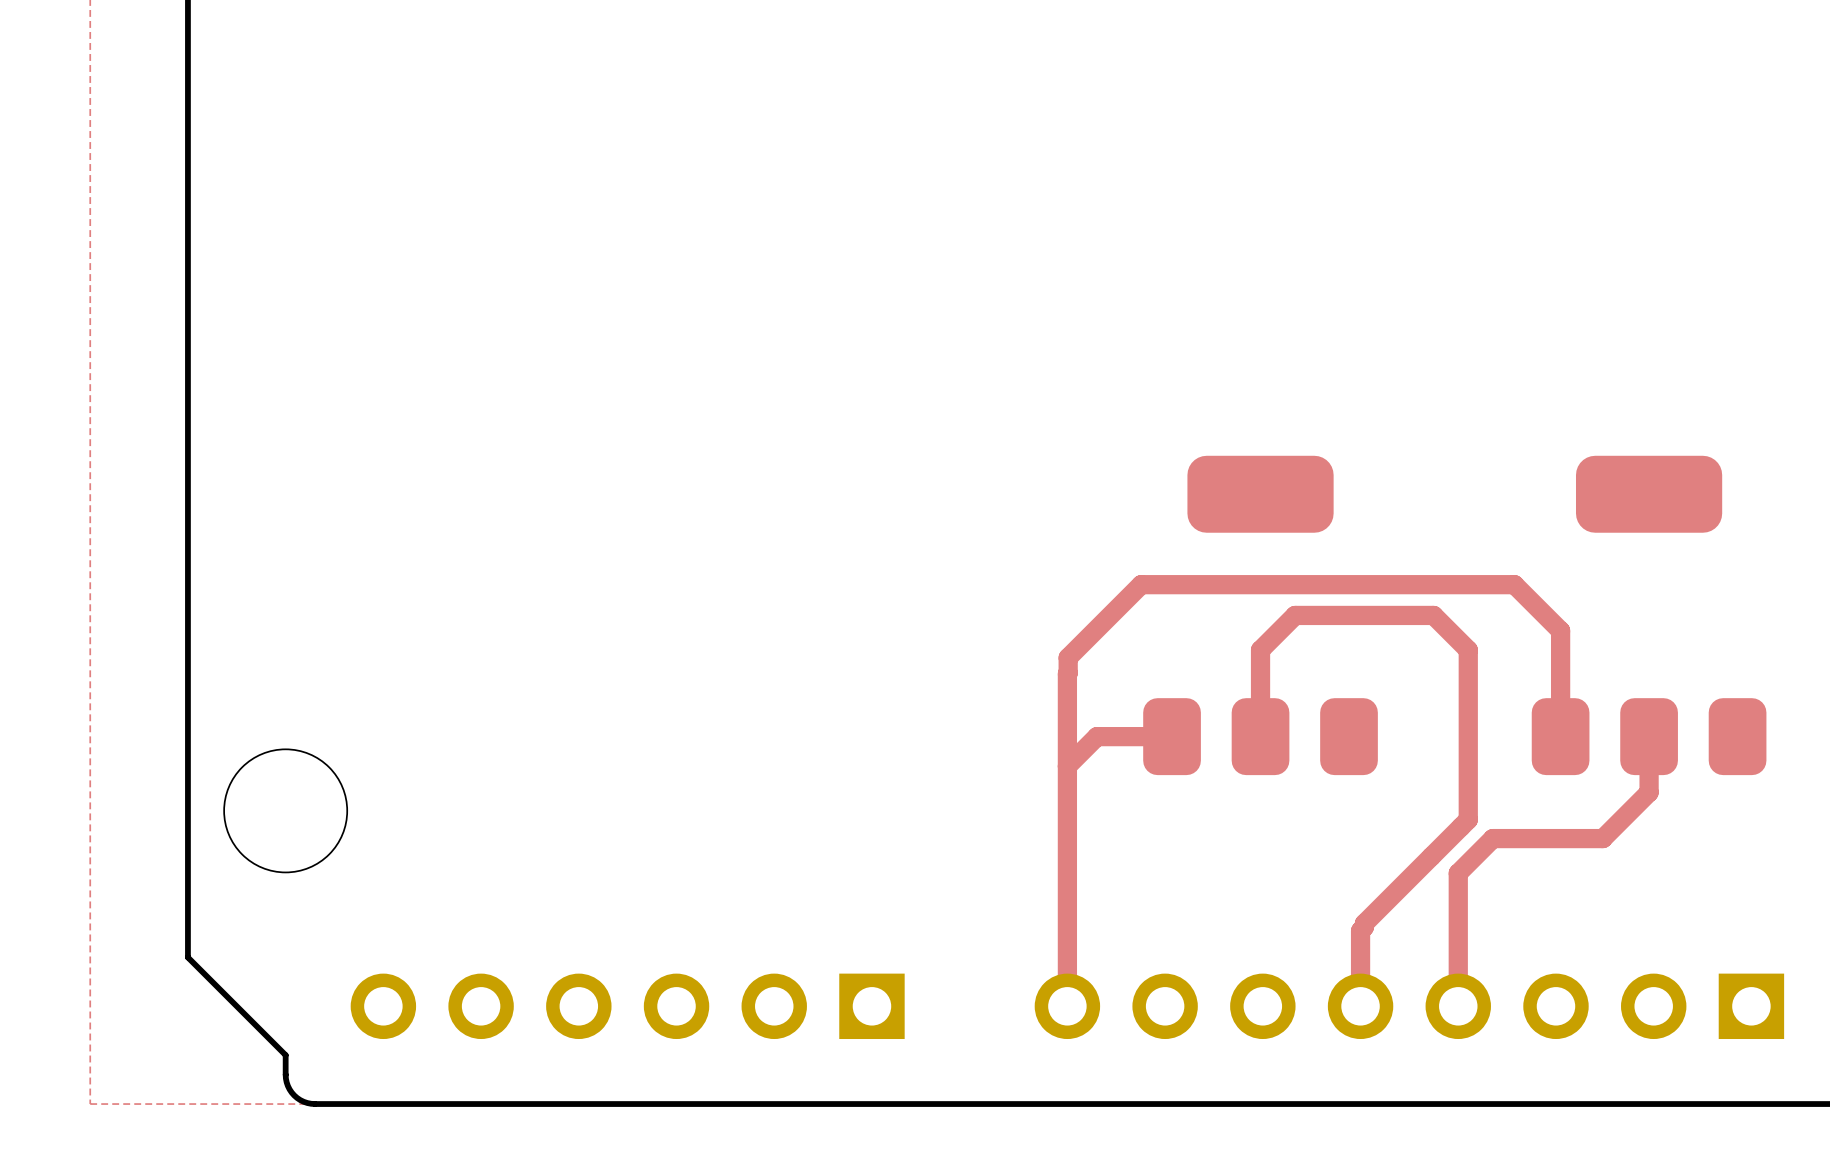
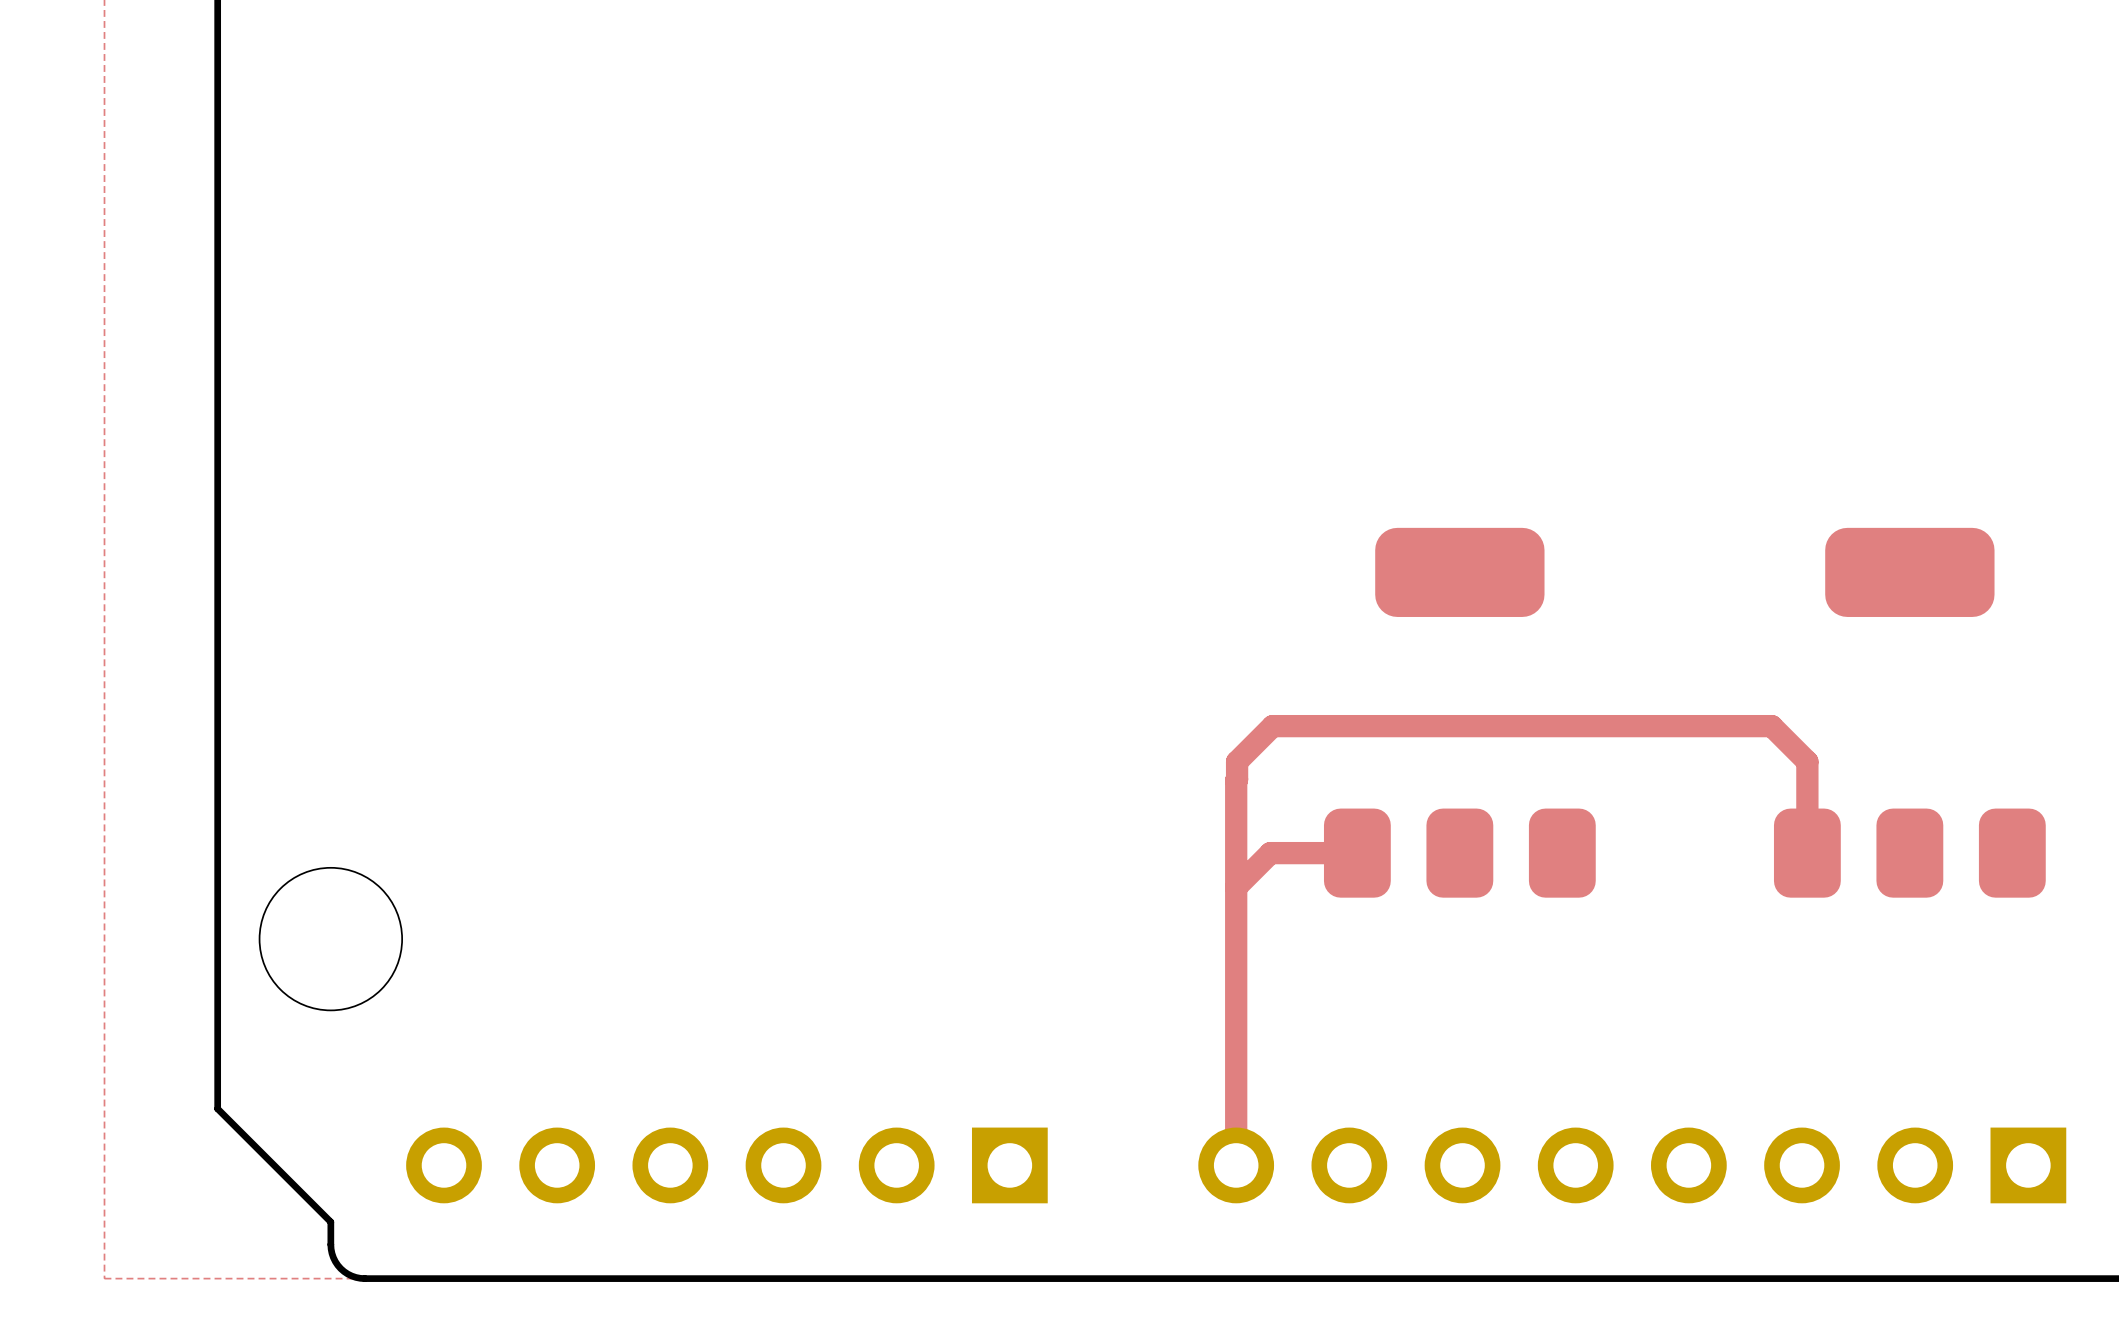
top track: (1098, 626) (1141, 584) (1514, 584) (1560, 630) (1560, 657) -> (1272, 726) (1771, 726) (1807, 761)
top track: (1260, 736) (1260, 650) (1295, 615) (1433, 615) (1468, 650) (1468, 819) (1364, 923) (1364, 927) (1360, 930) (1360, 1006) -> none
top track: (1649, 736) (1649, 792) (1602, 838) (1492, 838) (1458, 873) (1458, 1006) -> none

